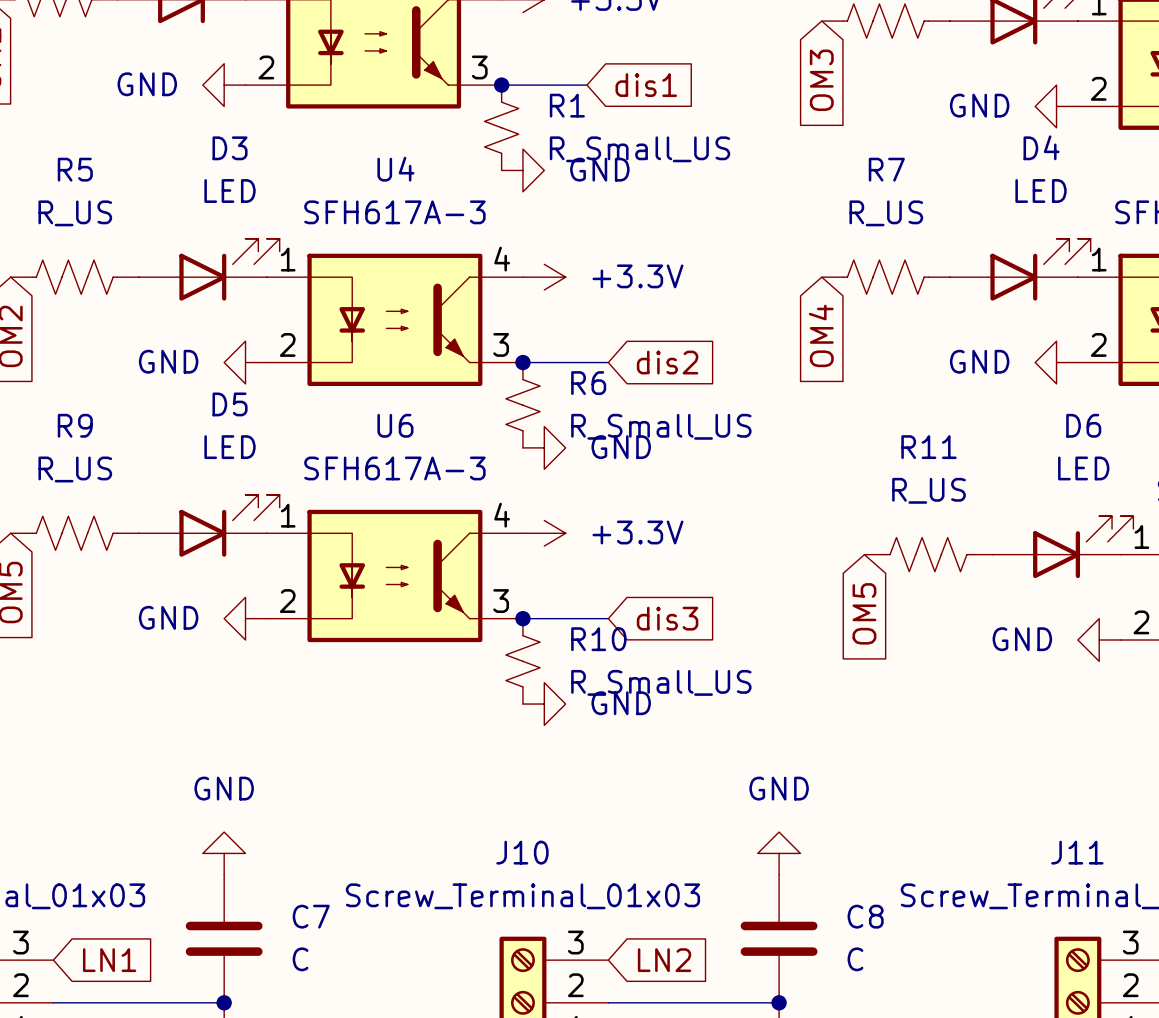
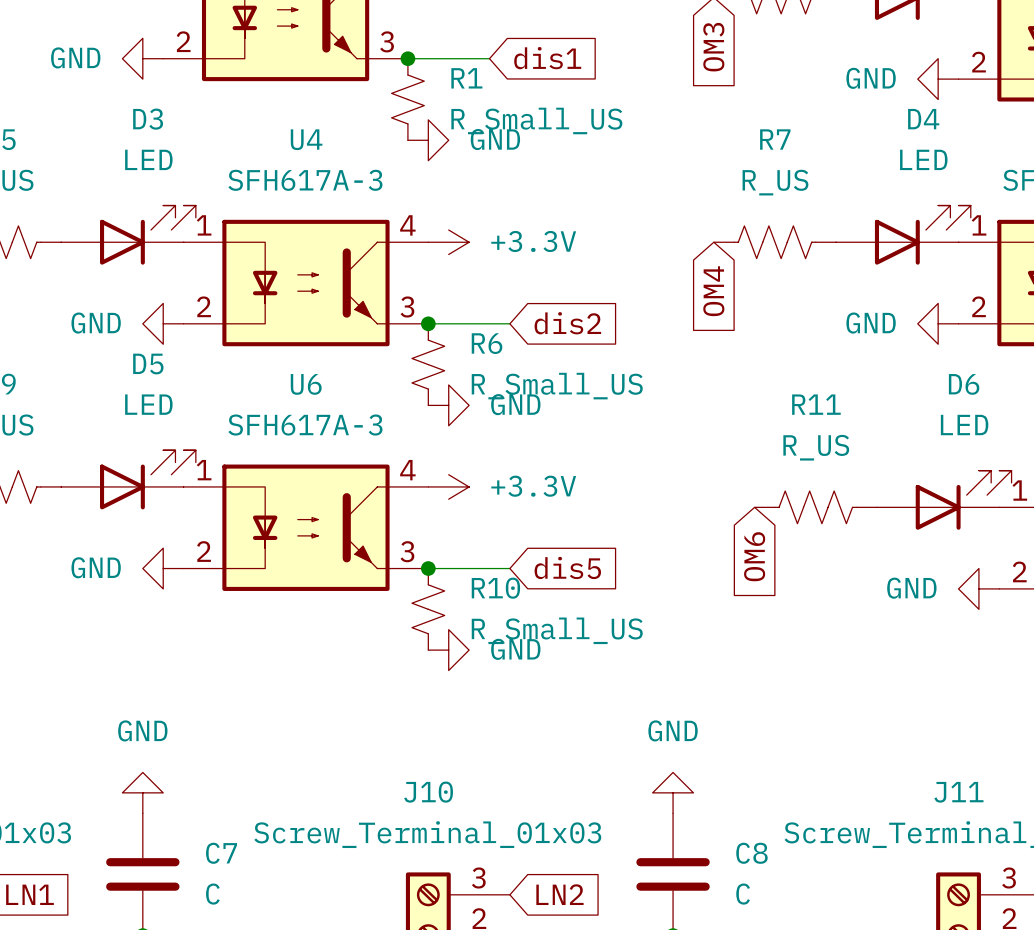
global label: OM5 (864, 613) -> OM6 (754, 556)
global label: dis3 (667, 618) -> dis5 (567, 567)

